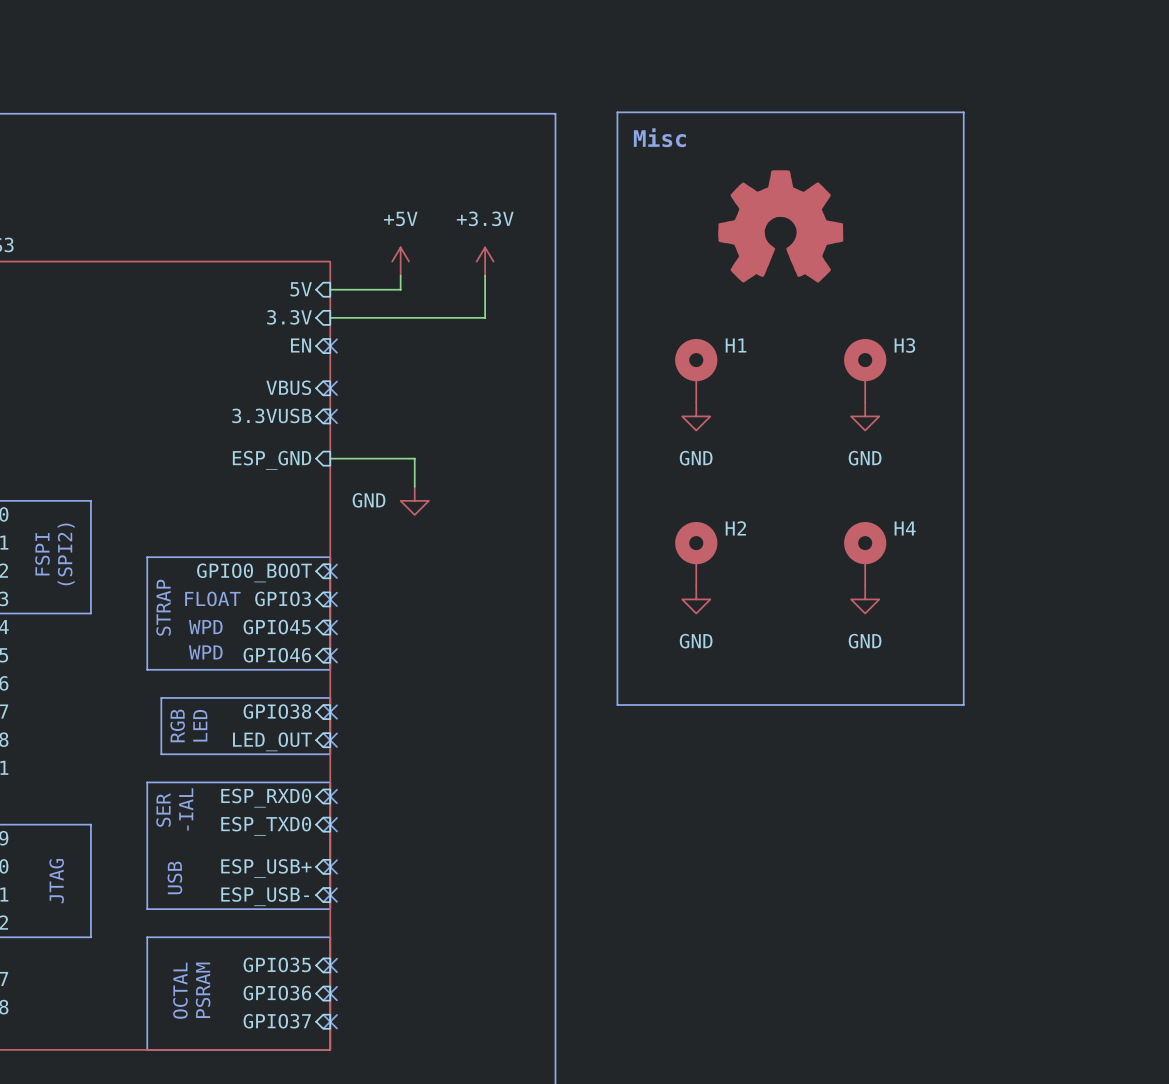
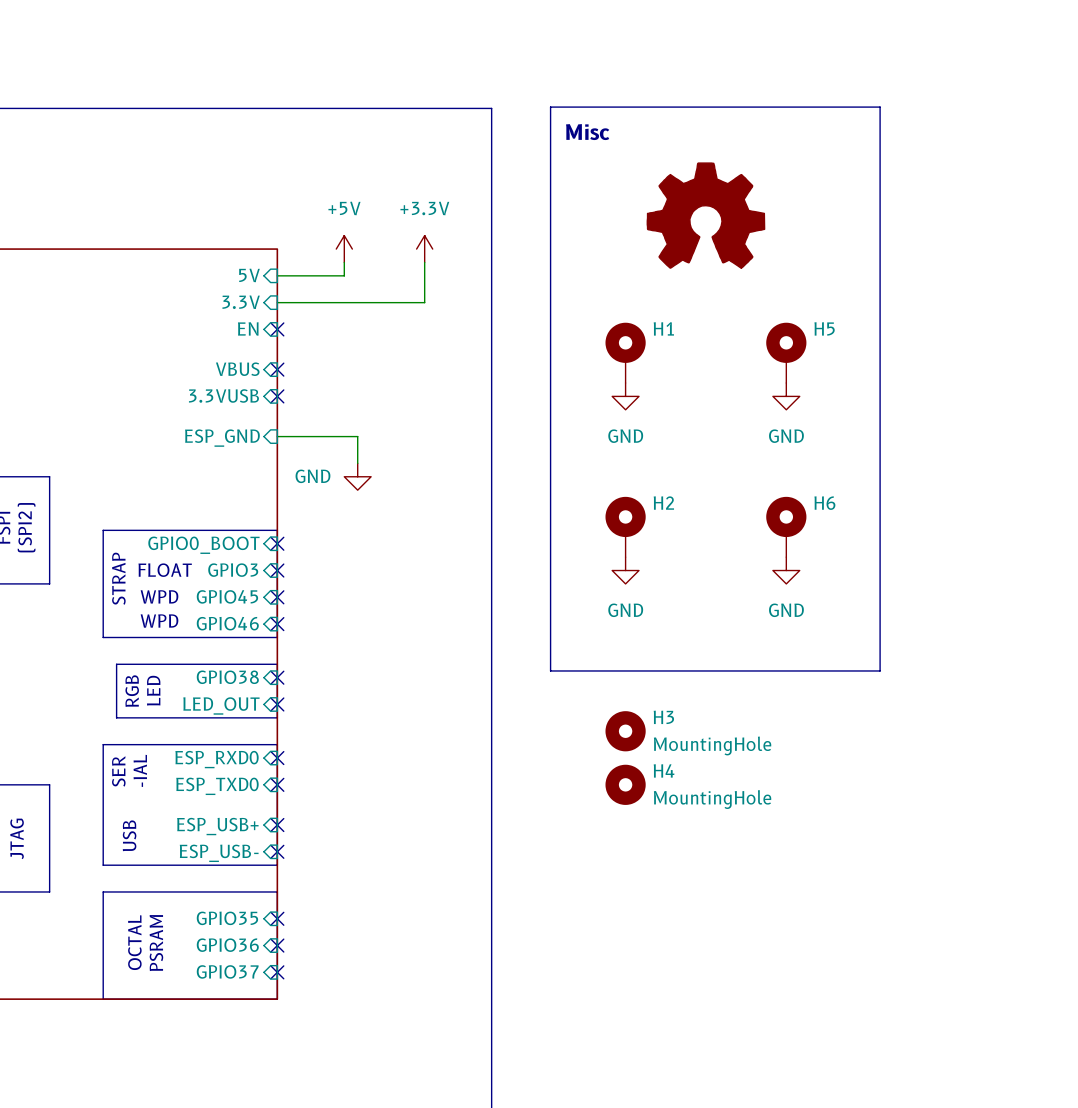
H3 name: H3 (904, 345) -> H5 (824, 328)
H4 name: H4 (905, 528) -> H6 (824, 503)
H3: none -> MountingHole (625, 731)
H4: none -> MountingHole (625, 784)

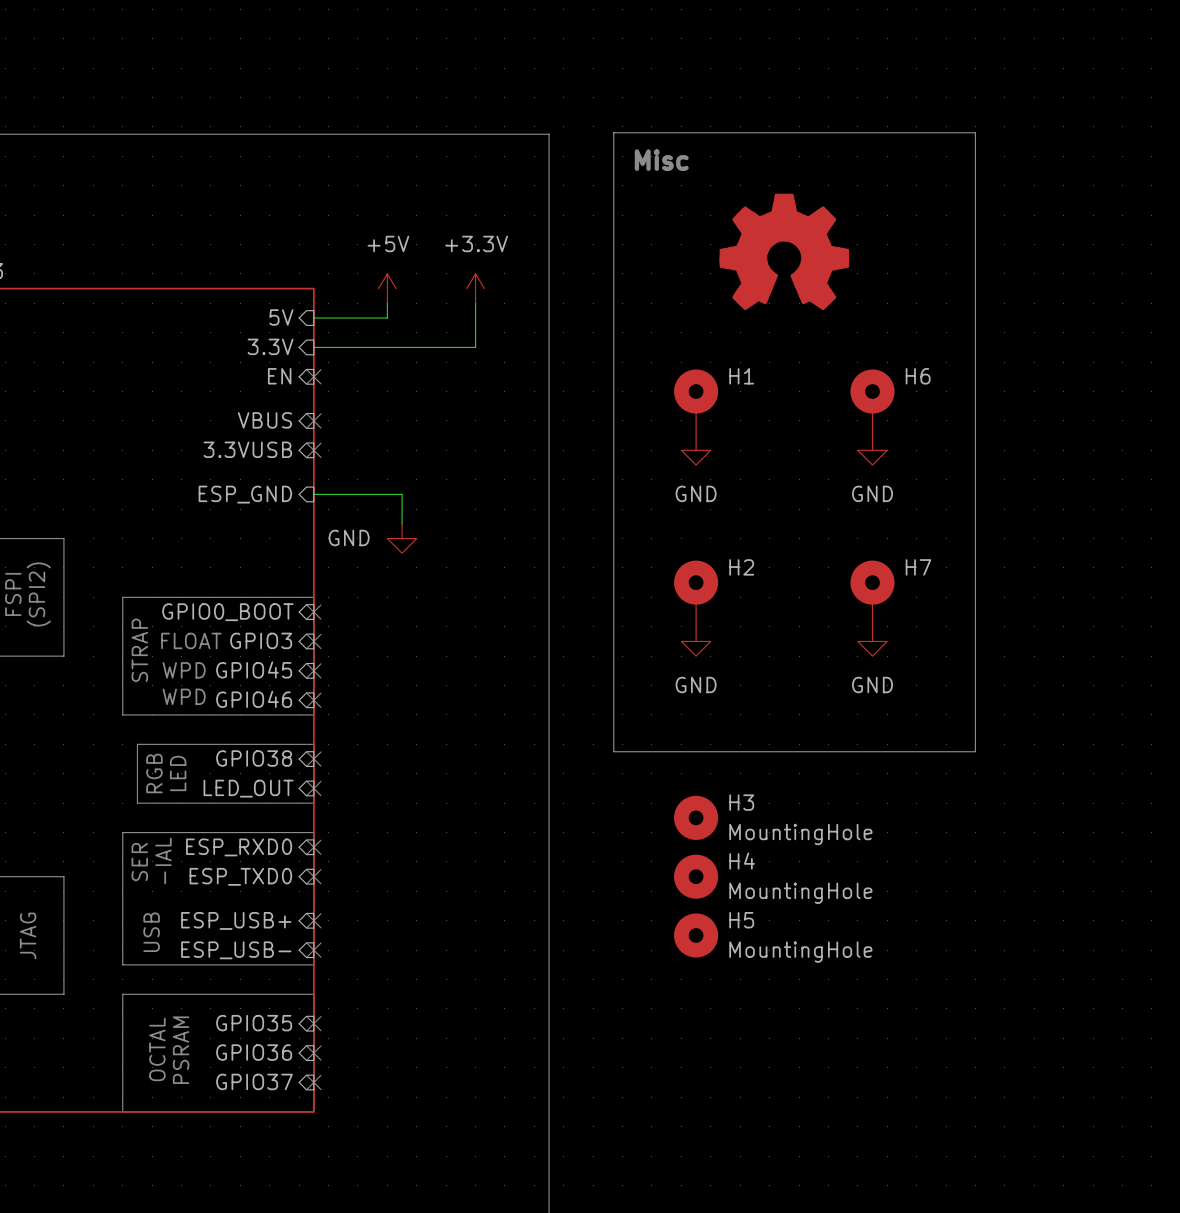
H5 name: H5 (824, 328) -> H6 (918, 376)
H6 name: H6 (824, 503) -> H7 (918, 567)
H5: none -> MountingHole (696, 935)

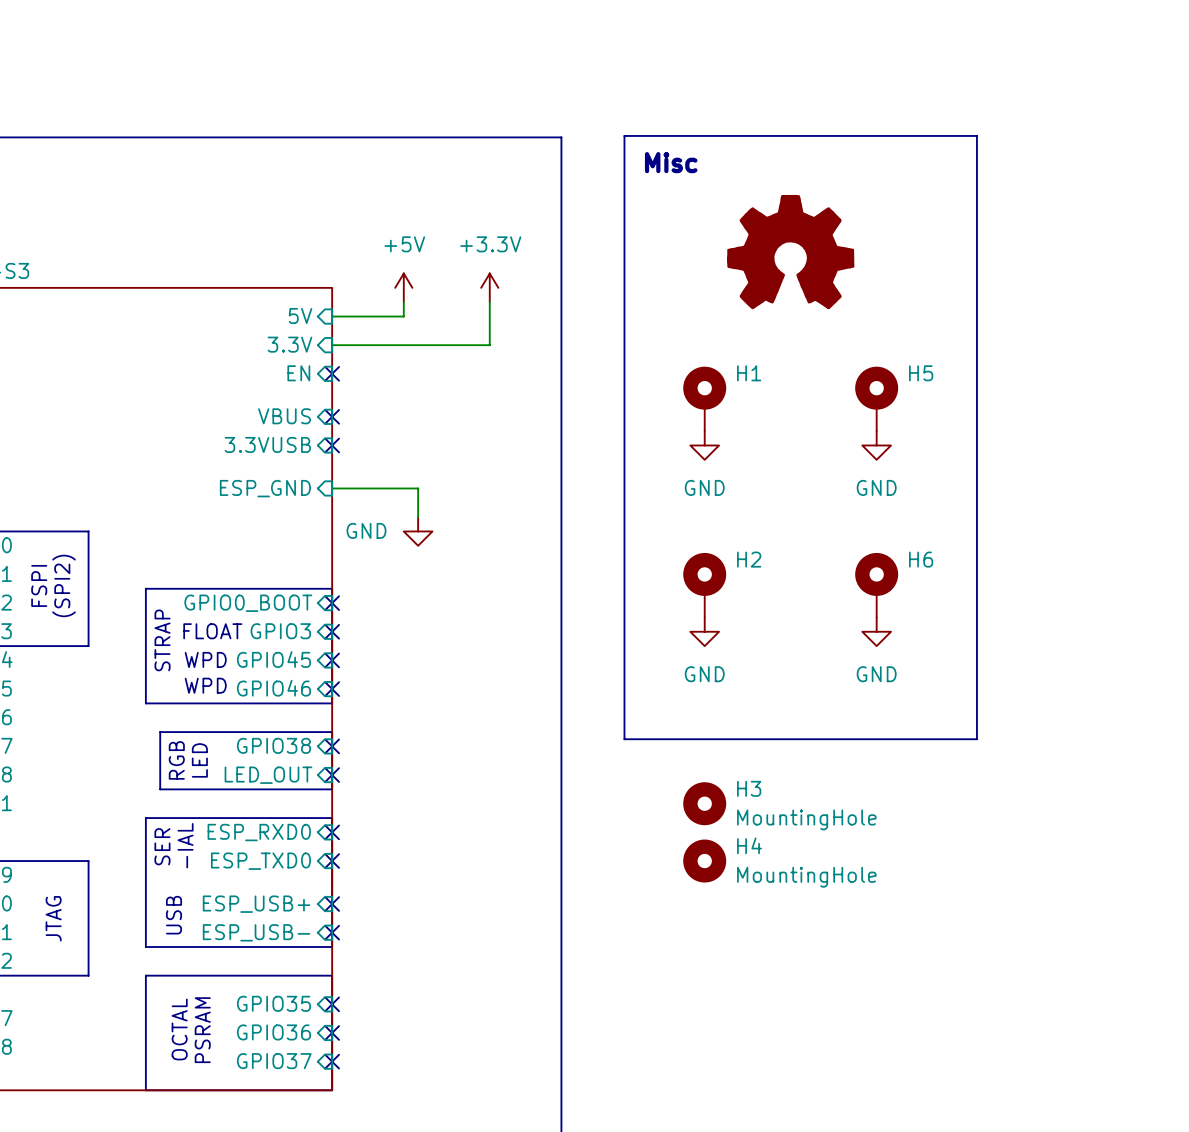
H6 name: H6 (918, 376) -> H5 (921, 373)
H7 name: H7 (918, 567) -> H6 (921, 559)
H5: MountingHole (696, 935) -> none

